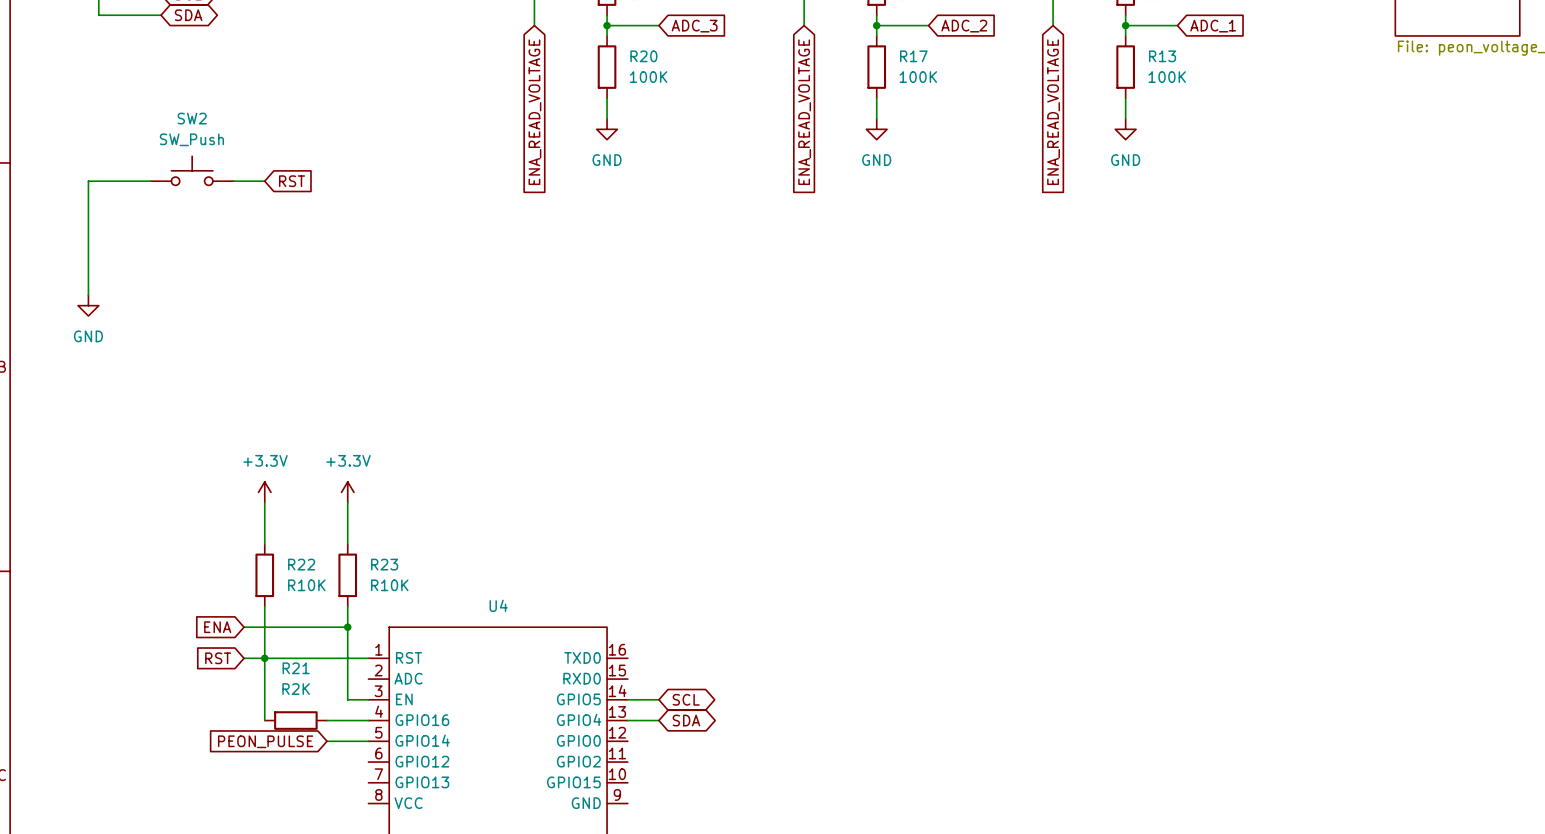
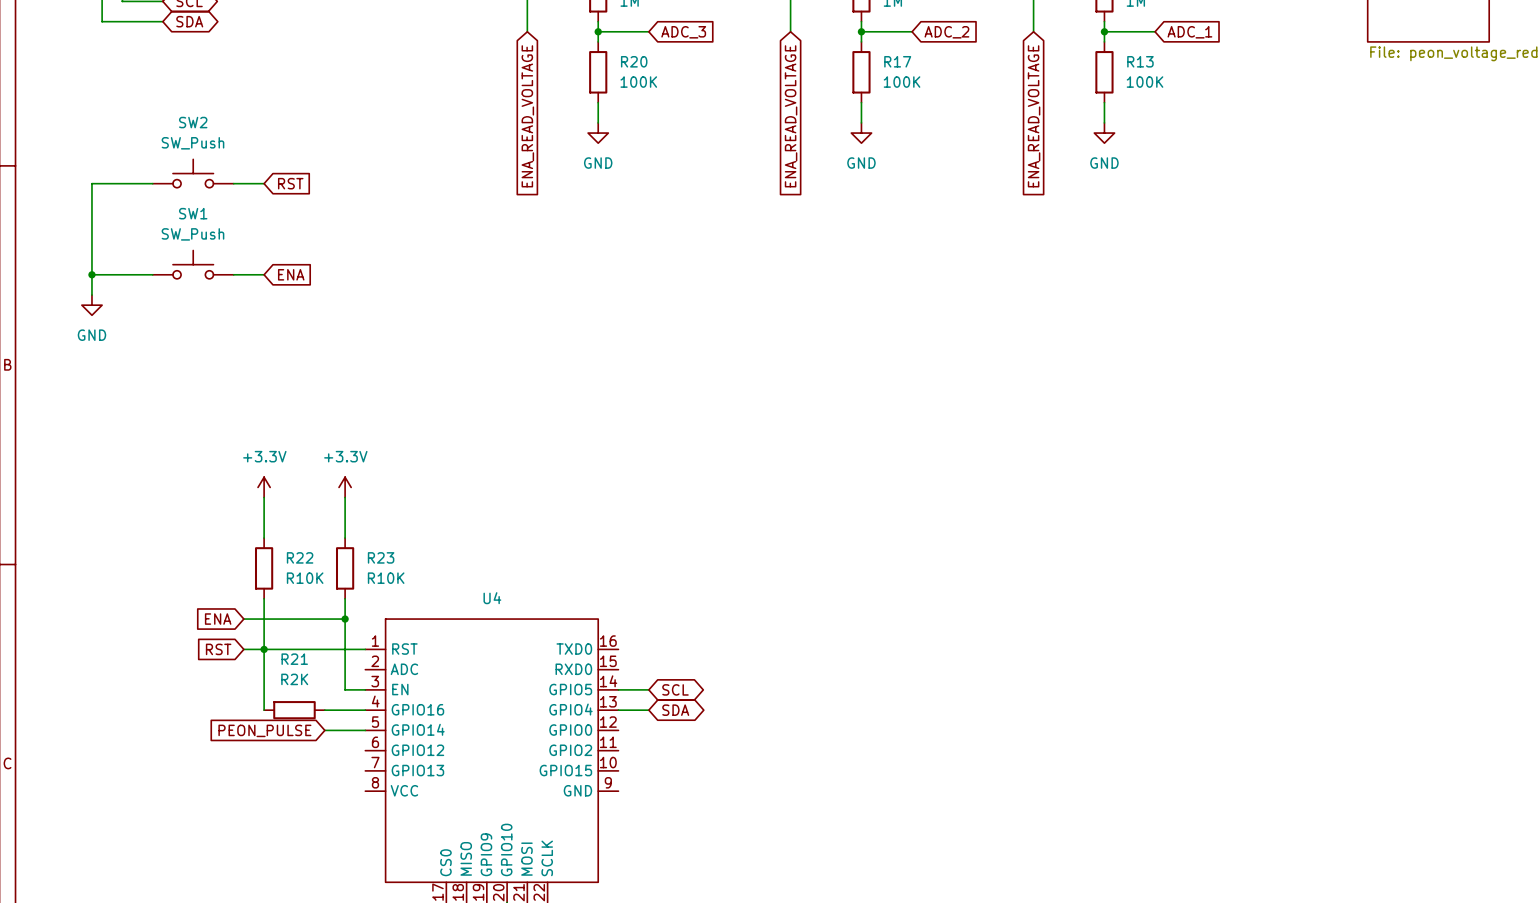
SW1: none -> SW_Push (193, 264)
wire: none -> (91, 274) (152, 274)
junction: none -> (91, 274)
wire: none -> (233, 274) (264, 274)
global label: none -> ENA (291, 274)

